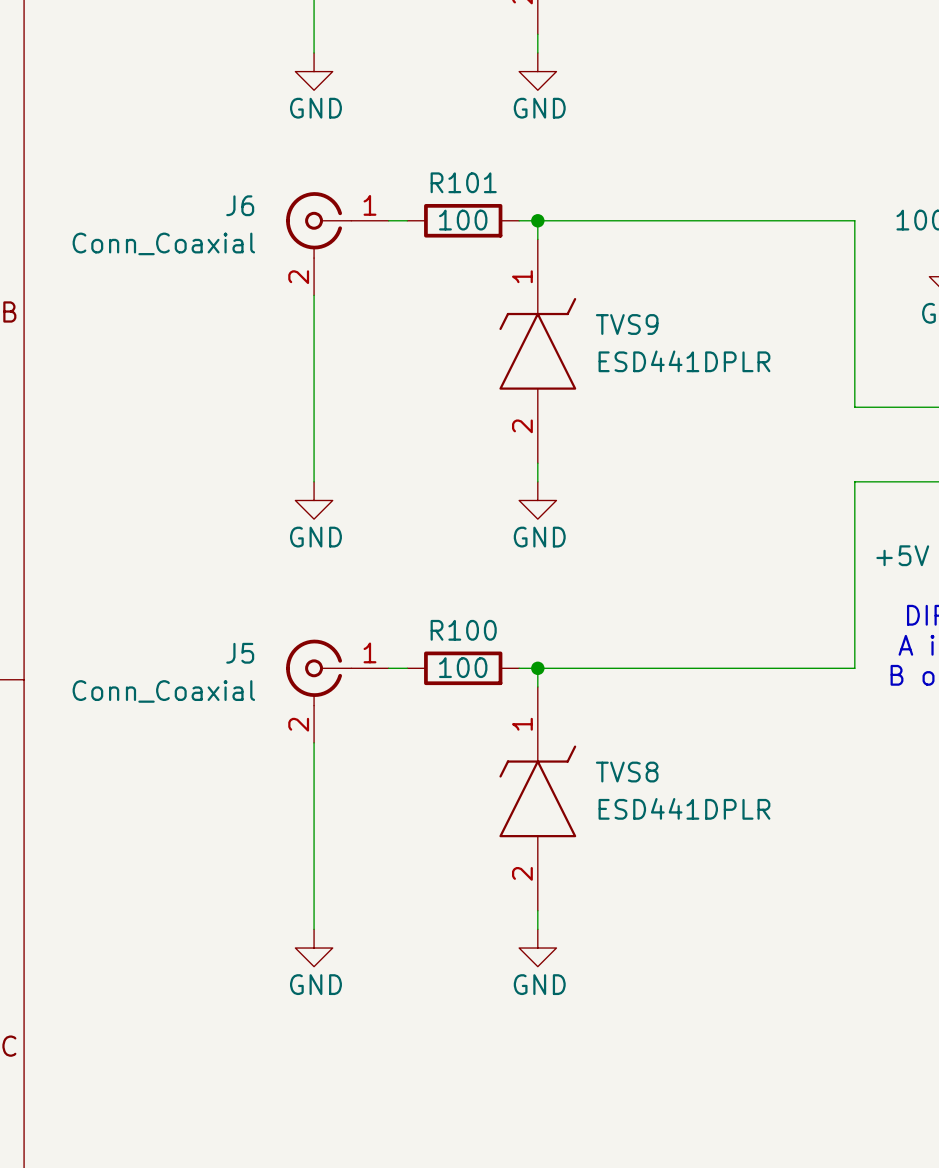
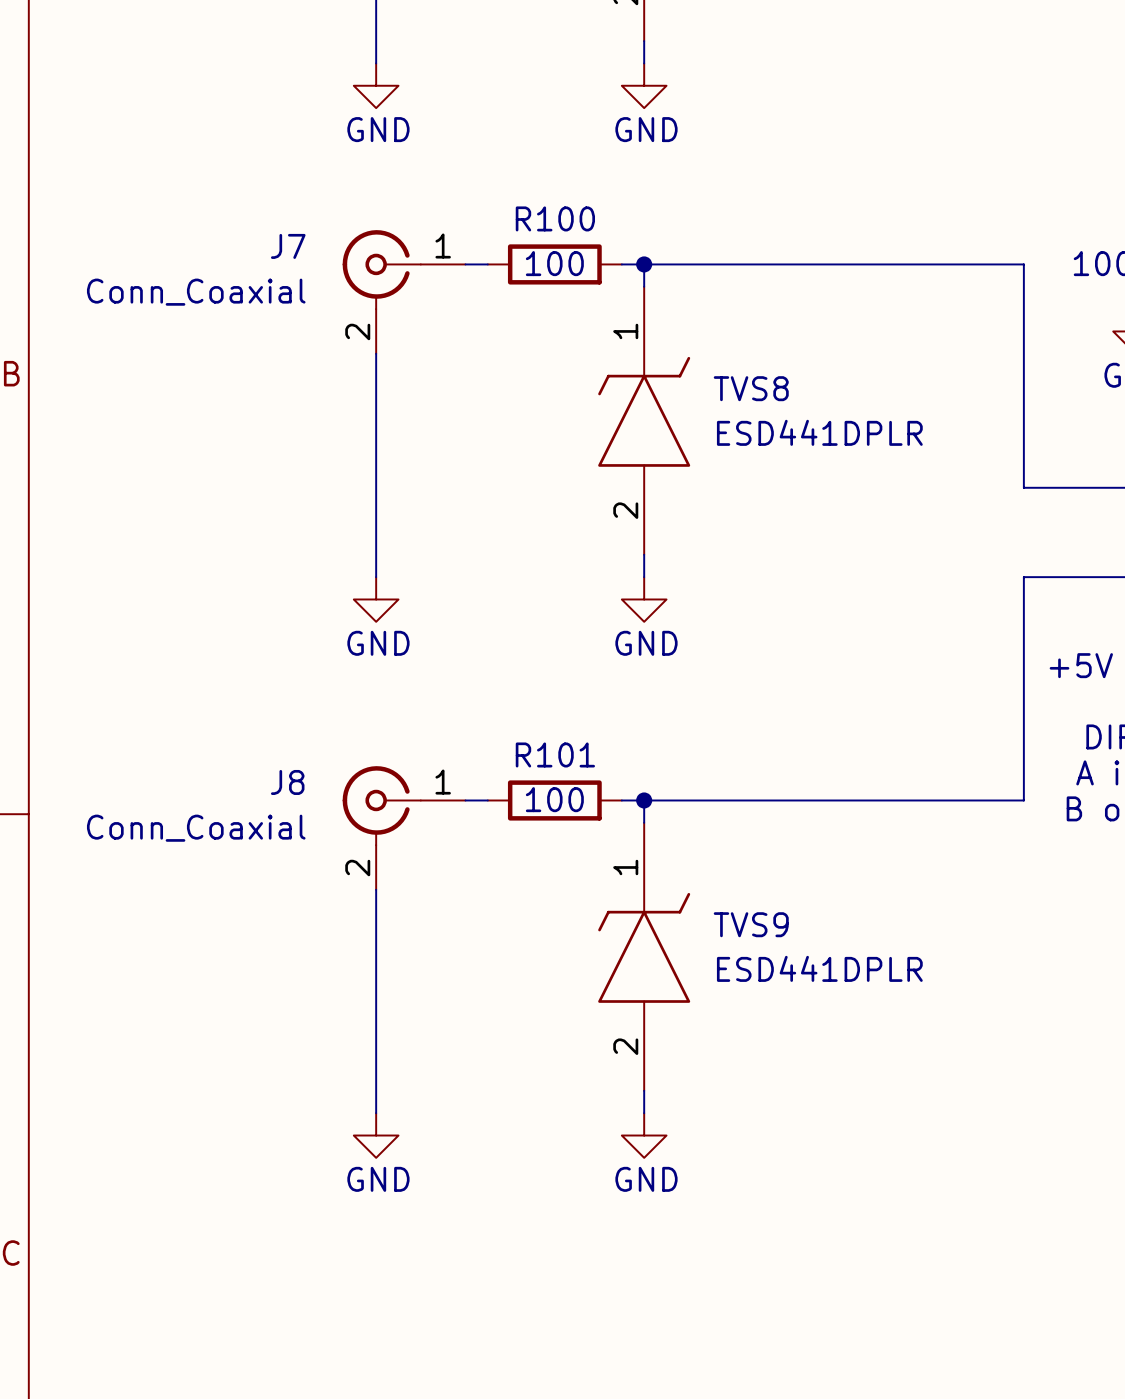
R101 name: R101 (463, 182) -> R100 (555, 218)
J6 name: J6 (240, 205) -> J7 (288, 246)
TVS9 name: TVS9 (627, 324) -> TVS8 (751, 388)
R100 name: R100 (463, 630) -> R101 (555, 754)
J5 name: J5 (240, 653) -> J8 (287, 782)
TVS8 name: TVS8 (627, 772) -> TVS9 (751, 924)

